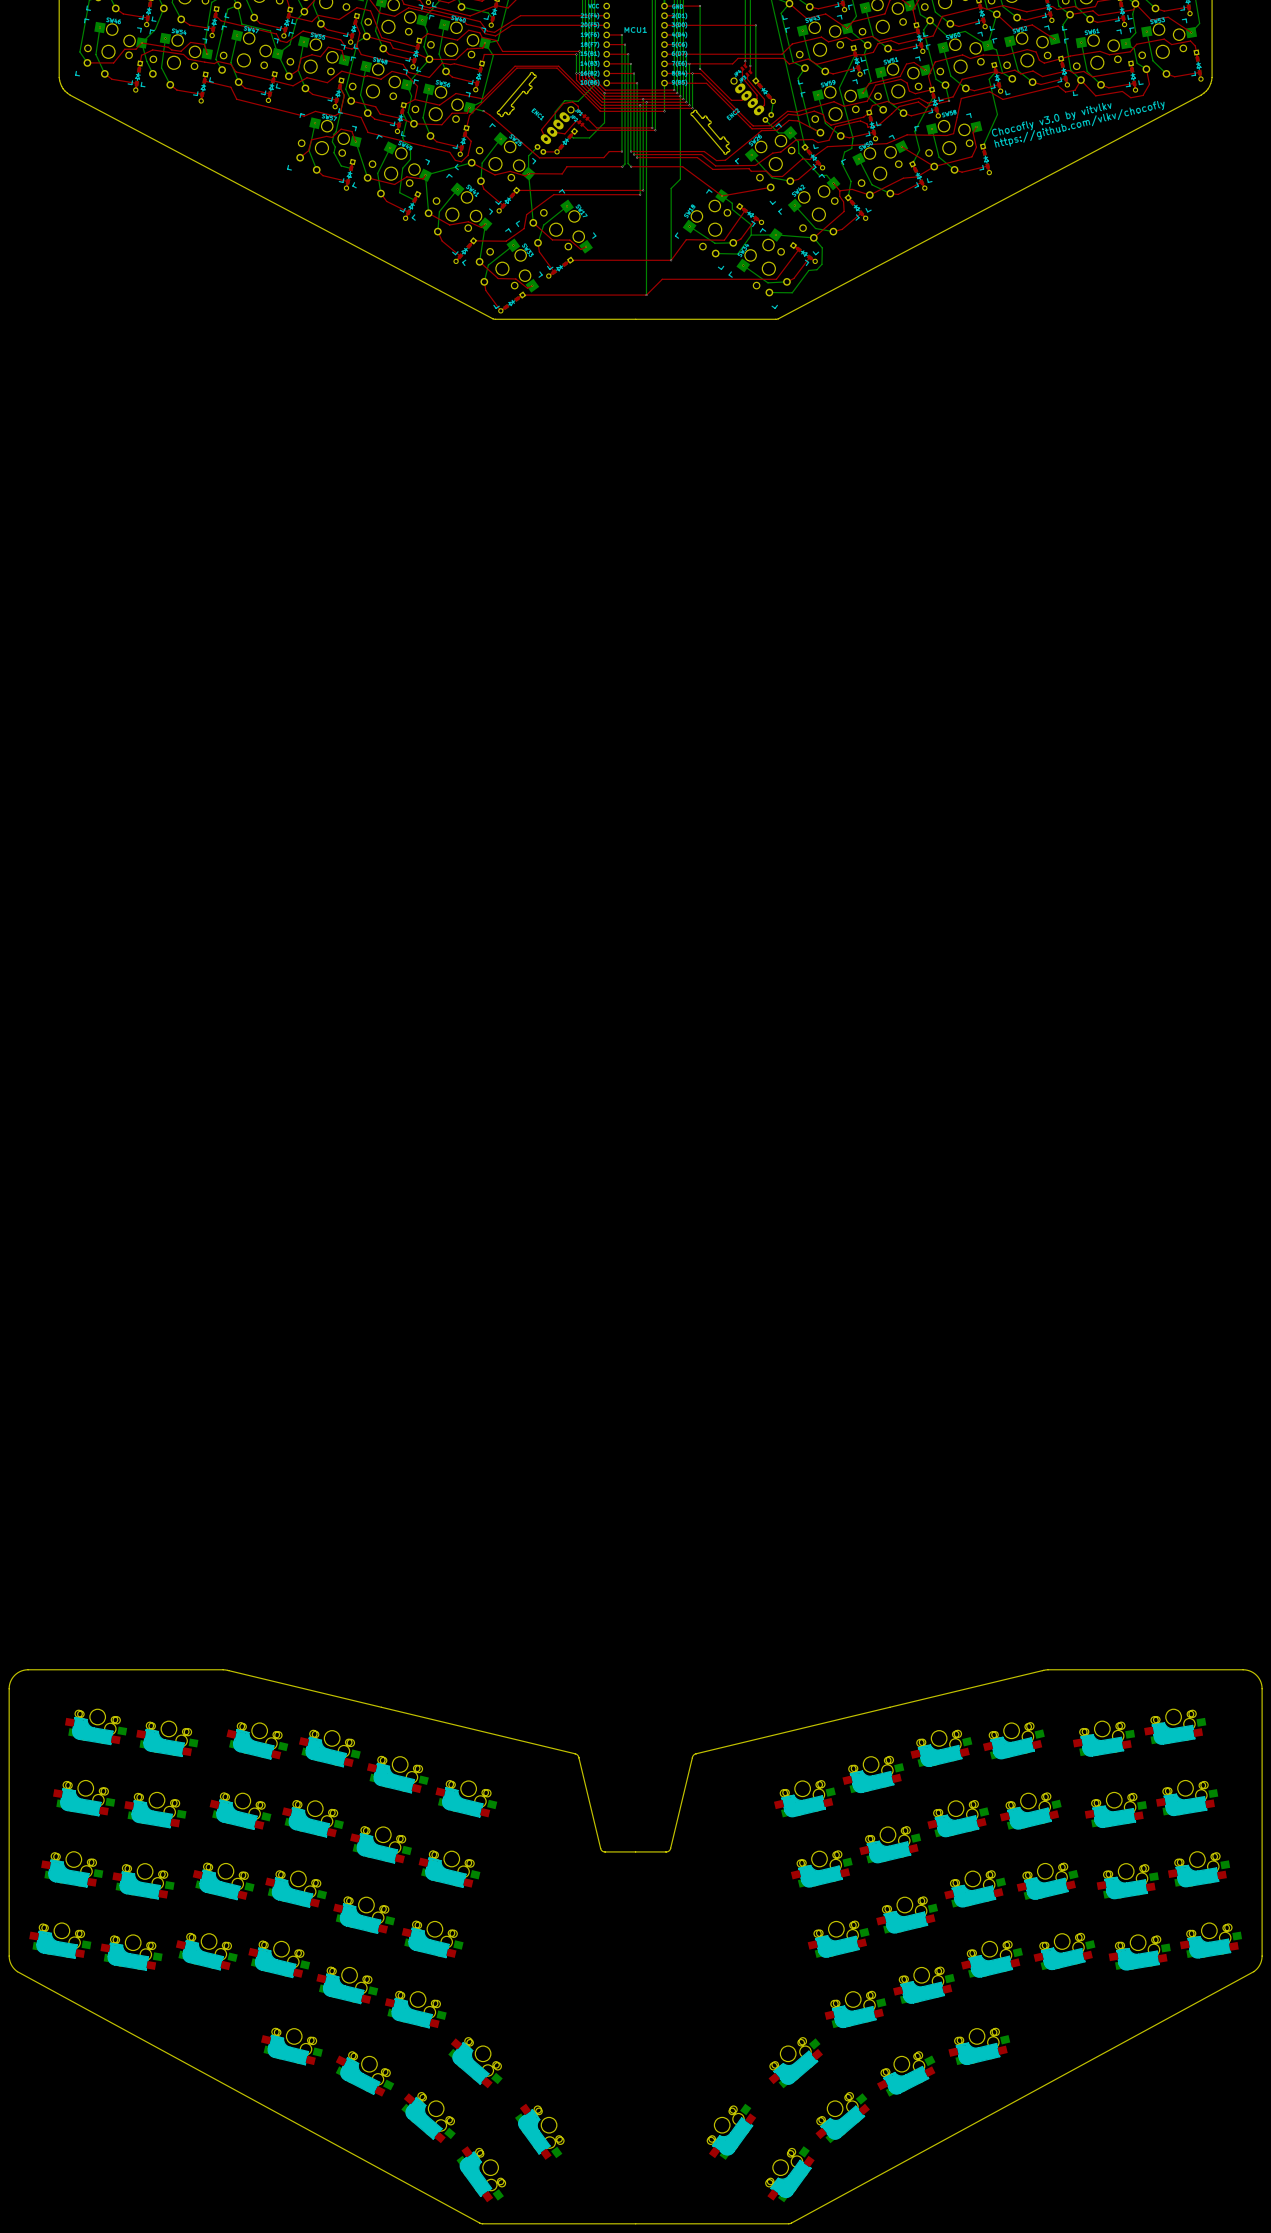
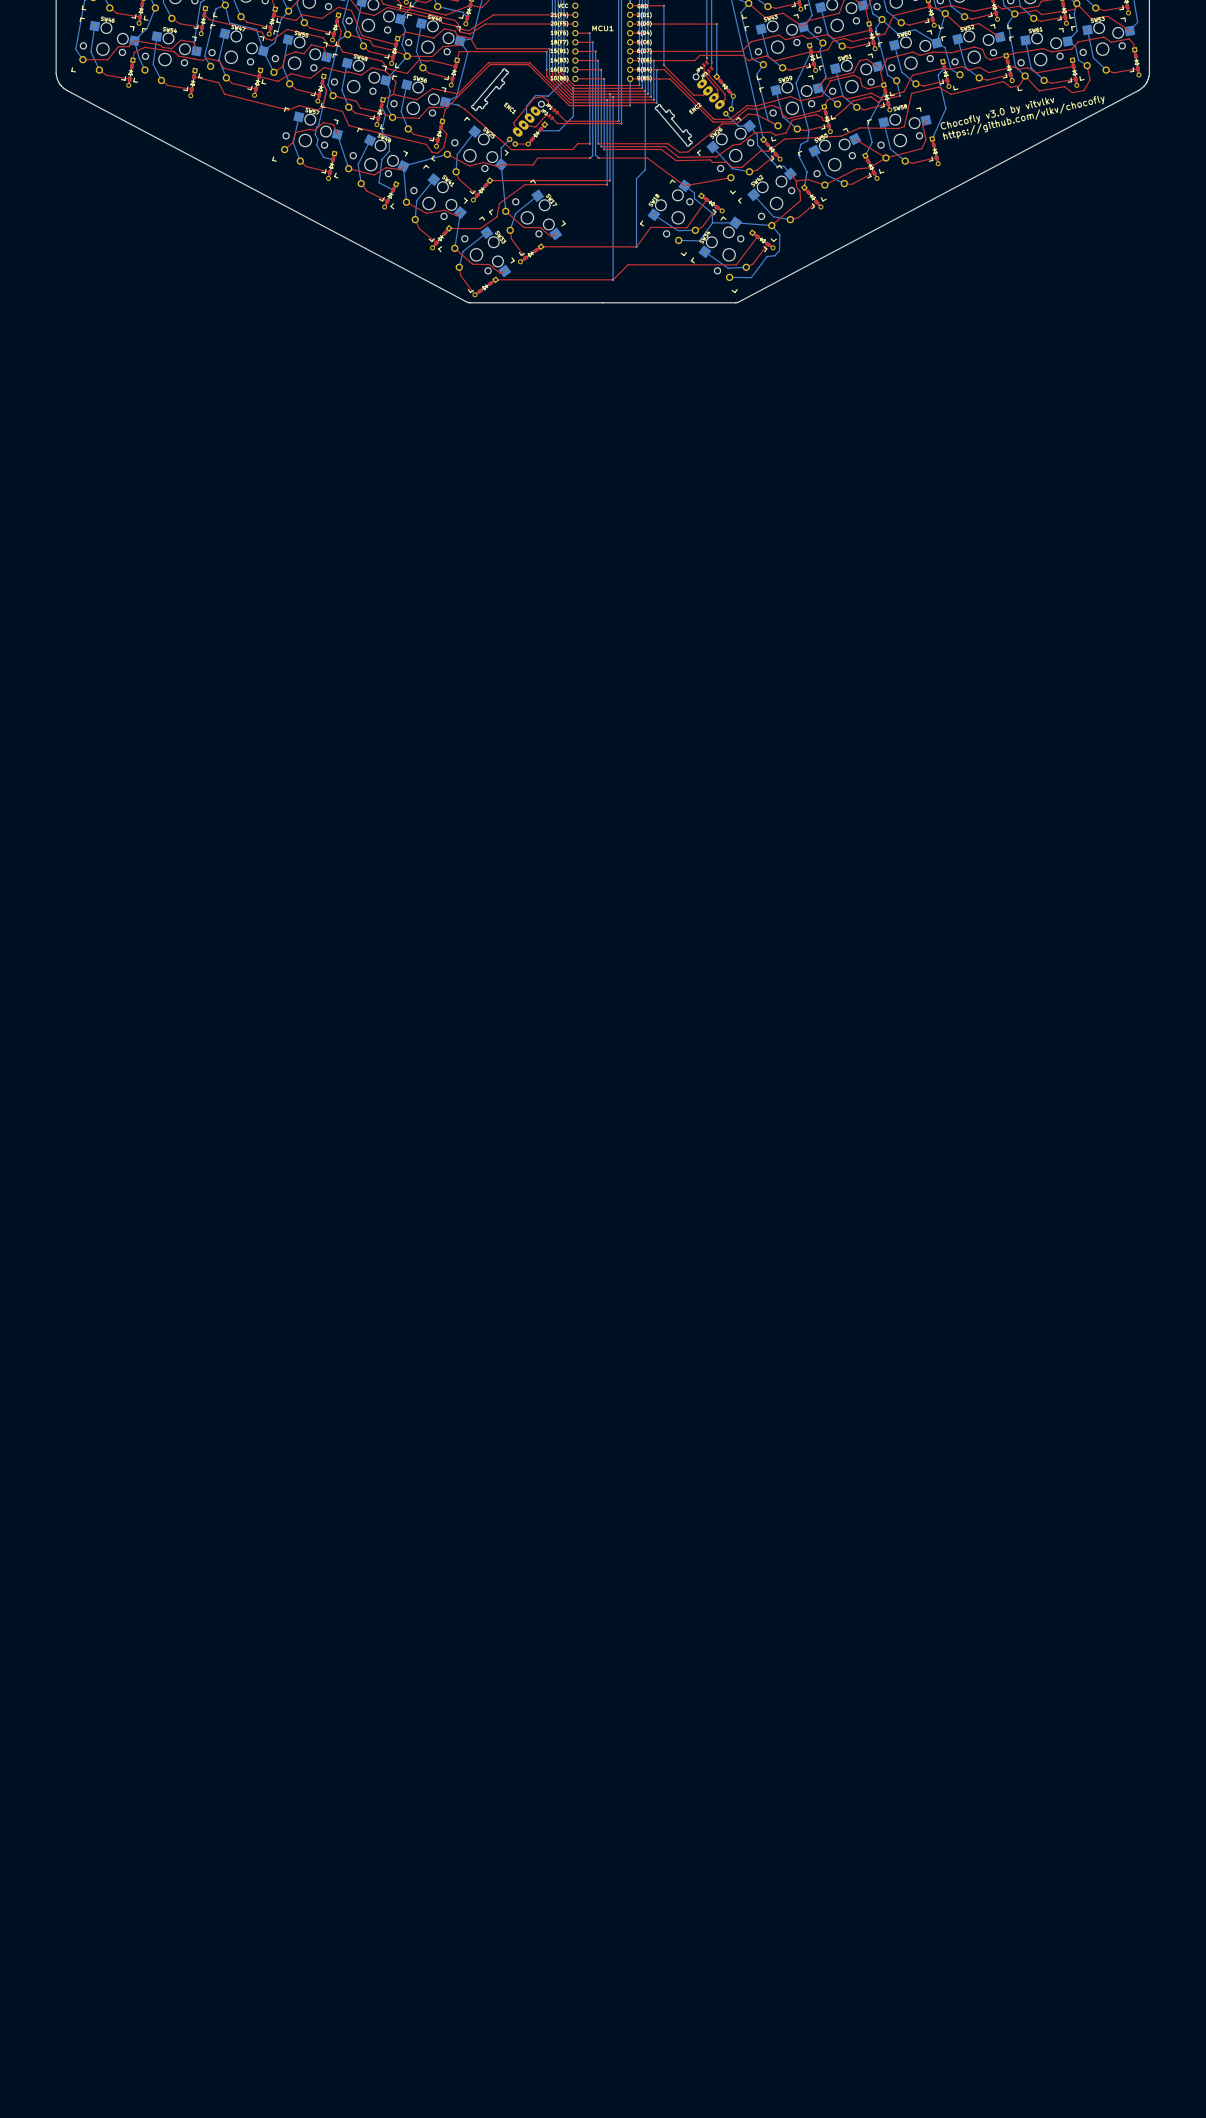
board edge: (28, 1669) (225, 1669) (575, 1753) (578, 1756) (600, 1849) (604, 1851) (669, 1850) (692, 1756) (696, 1753) (1045, 1669) (1247, 1670) (1257, 1676) (1262, 1688) (1261, 1959) (1253, 1971) (790, 2223) (481, 2223) (13, 1967) (9, 1956) (9, 1688) (14, 1675) (28, 1669) -> none
part: (1175, 1726) -> none
part: (96, 1727) -> none
part: (1103, 1738) -> none
part: (167, 1739) -> none
part: (257, 1741) -> none
part: (1013, 1741) -> none
part: (329, 1748) -> none
part: (941, 1748) -> none
part: (397, 1774) -> none
part: (873, 1774) -> none
part: (84, 1798) -> none
part: (1187, 1798) -> none
part: (466, 1799) -> none
part: (804, 1799) -> none
part: (155, 1810) -> none
part: (1115, 1810) -> none
part: (240, 1811) -> none
part: (1030, 1811) -> none
part: (312, 1818) -> none
part: (958, 1818) -> none
part: (381, 1845) -> none
part: (890, 1845) -> none
part: (72, 1869) -> none
part: (449, 1869) -> none
part: (821, 1869) -> none
part: (1199, 1869) -> none
part: (143, 1881) -> none
part: (223, 1881) -> none
part: (1047, 1881) -> none
part: (1127, 1881) -> none
part: (296, 1889) -> none
part: (975, 1889) -> none
part: (364, 1915) -> none
part: (907, 1915) -> none
part: (432, 1939) -> none
part: (838, 1939) -> none
part: (60, 1940) -> none
part: (1210, 1940) -> none
part: (206, 1951) -> none
part: (1064, 1951) -> none
part: (131, 1952) -> none
part: (1139, 1952) -> none
part: (279, 1959) -> none
part: (992, 1959) -> none
part: (347, 1985) -> none
part: (923, 1985) -> none
part: (415, 2009) -> none
part: (855, 2009) -> none
part: (291, 2046) -> none
part: (979, 2046) -> none
part: (475, 2063) -> none
part: (795, 2063) -> none
part: (365, 2074) -> none
part: (906, 2074) -> none
part: (428, 2117) -> none
part: (842, 2117) -> none
part: (539, 2131) -> none
part: (731, 2131) -> none
part: (481, 2174) -> none
part: (790, 2174) -> none

